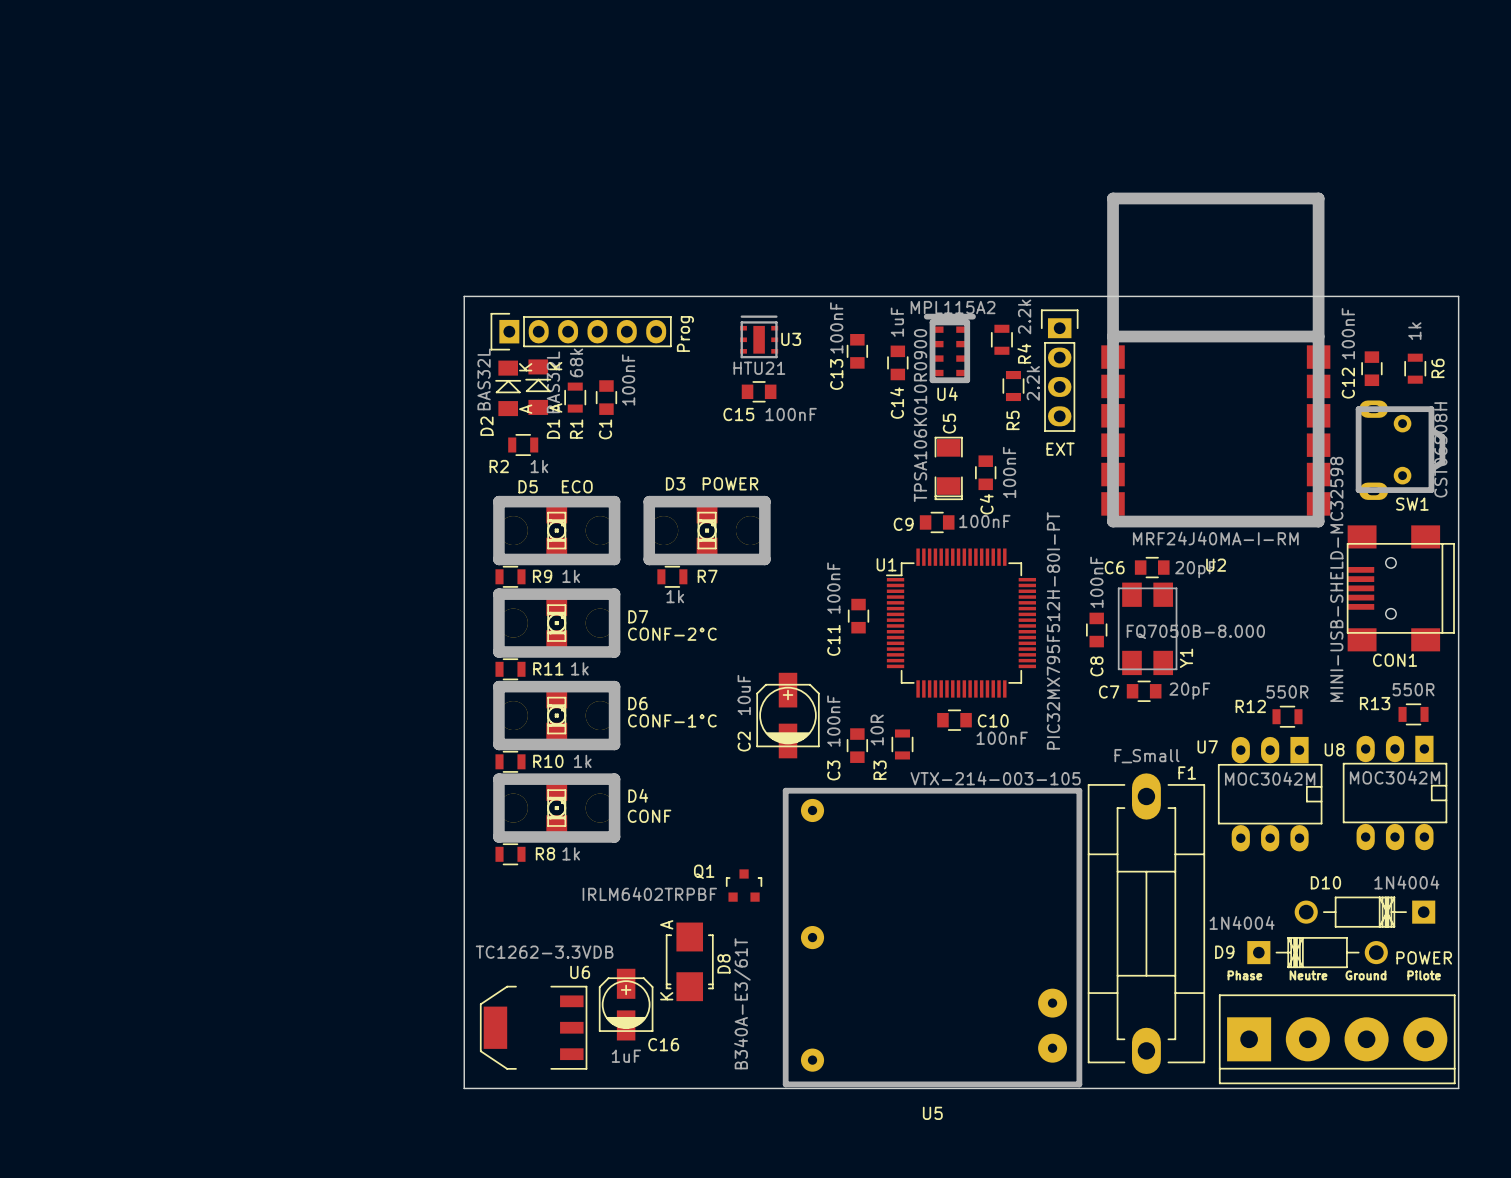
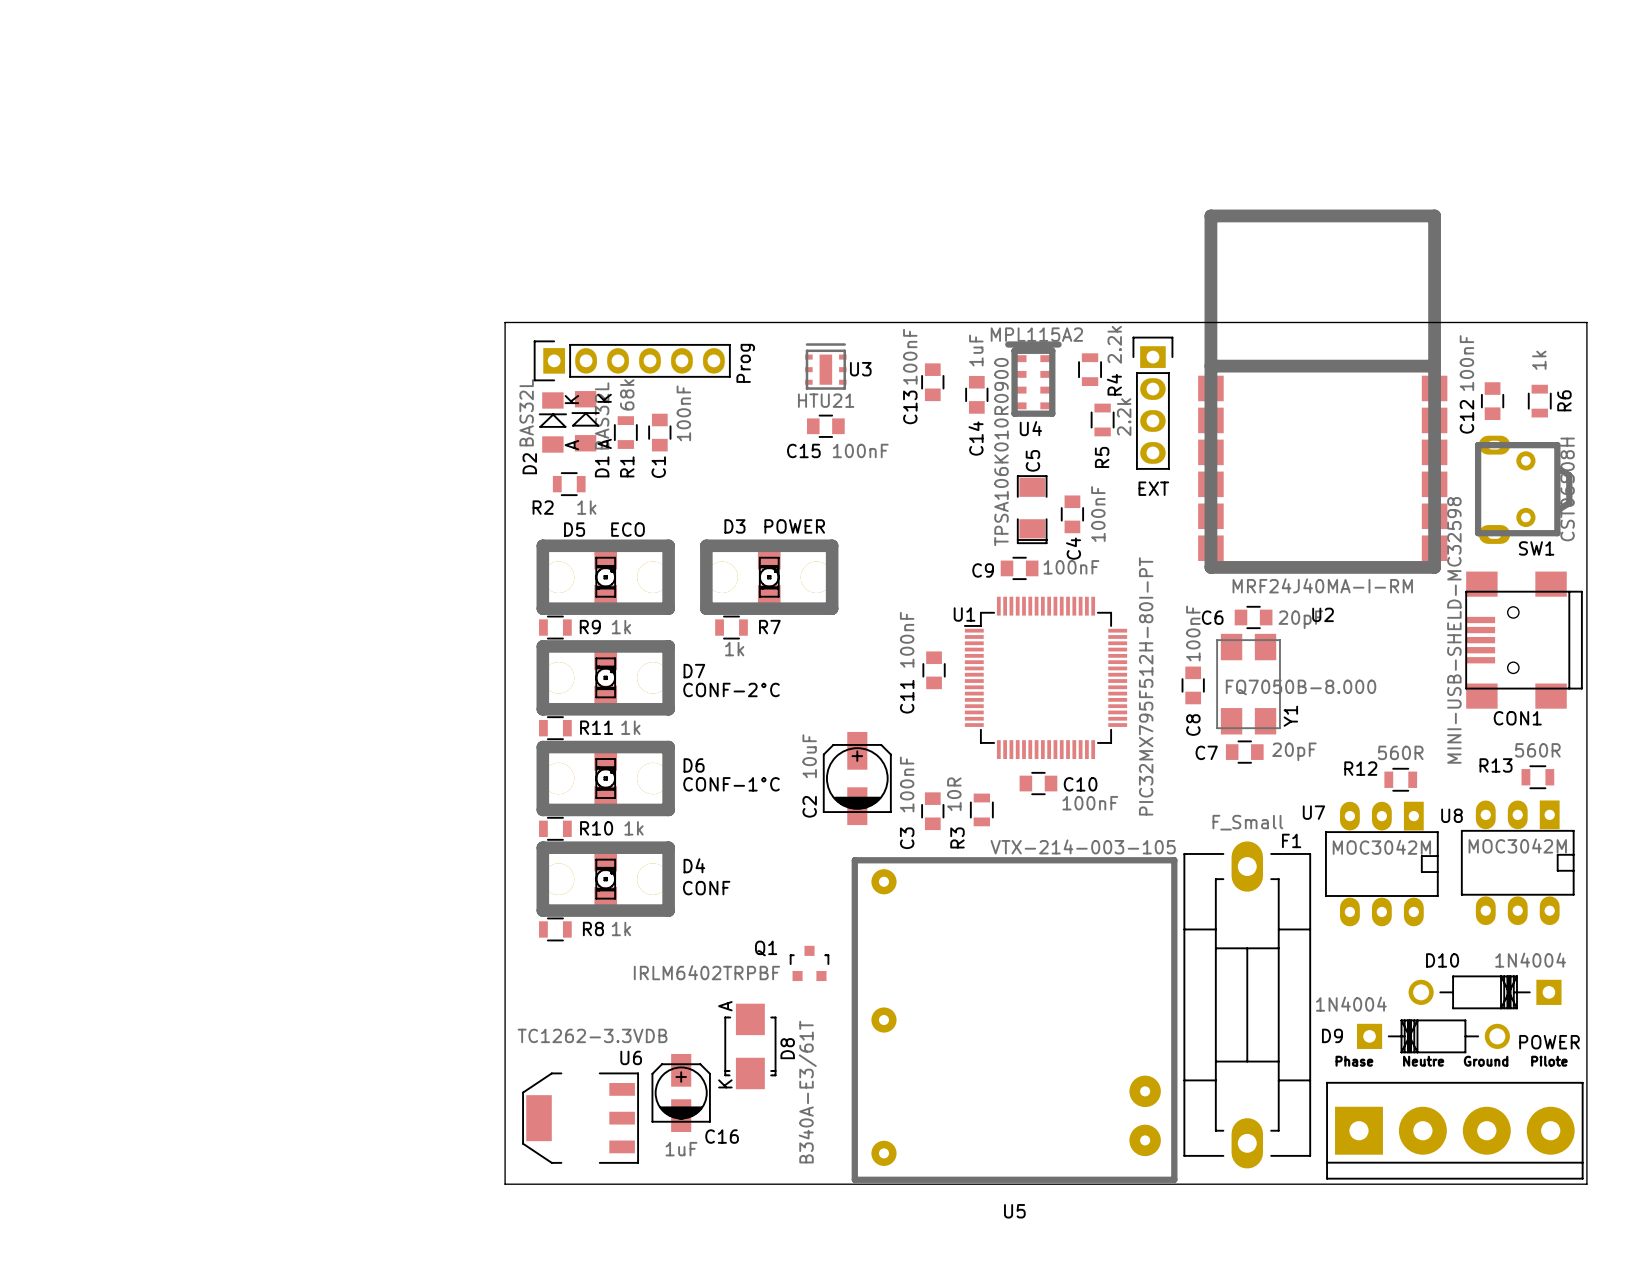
R13 value: 550R (1413, 689) -> 560R (1537, 750)
R12 value: 550R (1287, 692) -> 560R (1400, 752)

